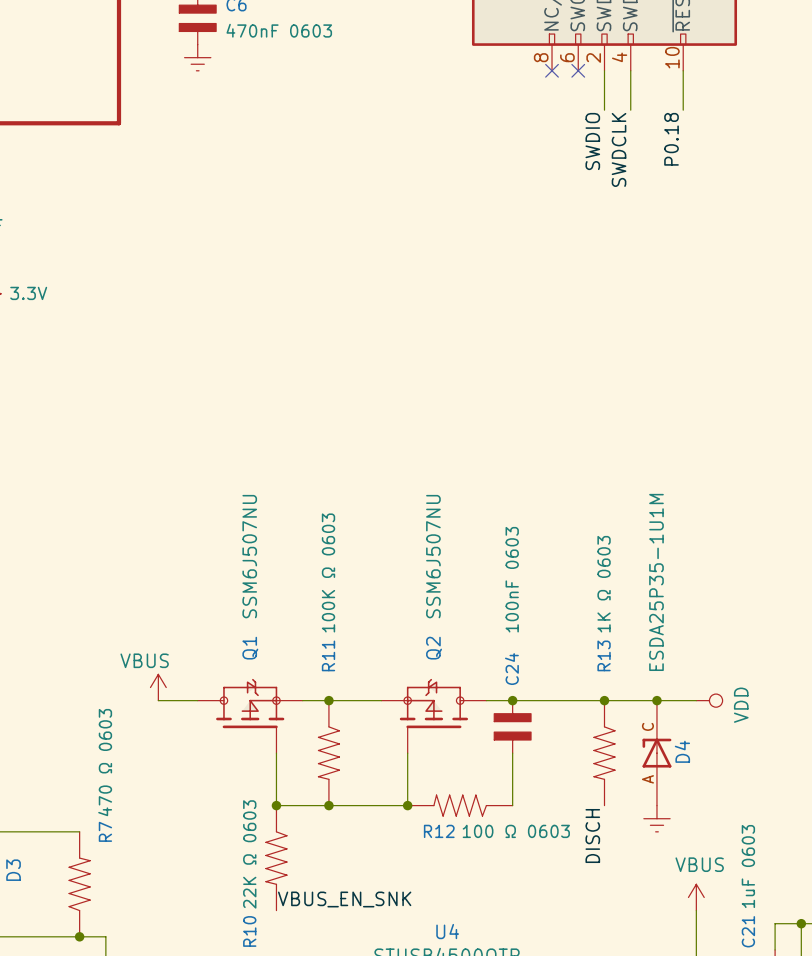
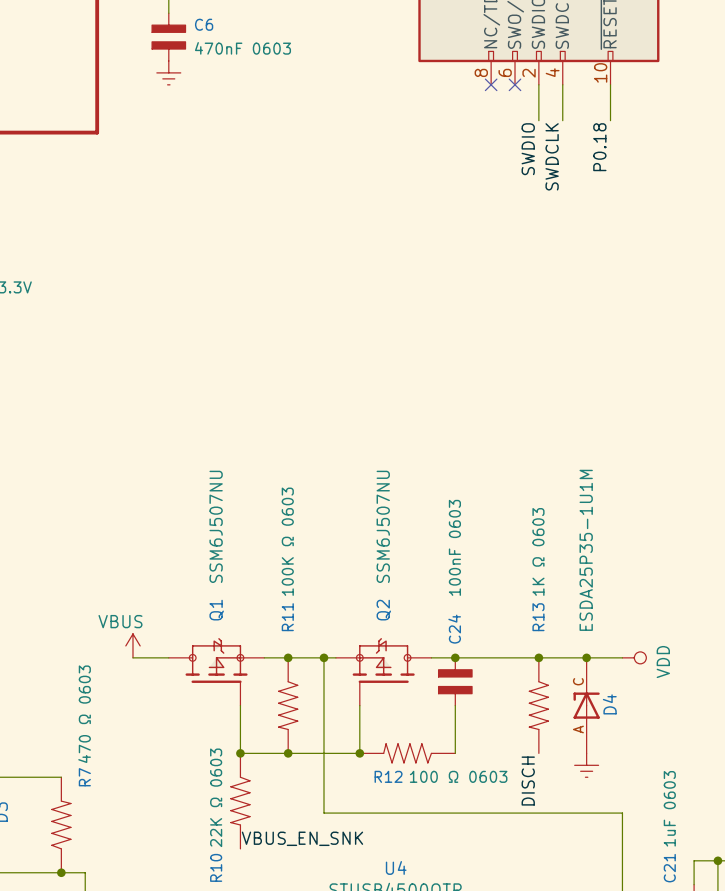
wire: none -> (323, 657) (323, 813) (622, 813) (622, 848)
junction: none -> (323, 657)
power symbol: VBUS (696, 897) -> none

